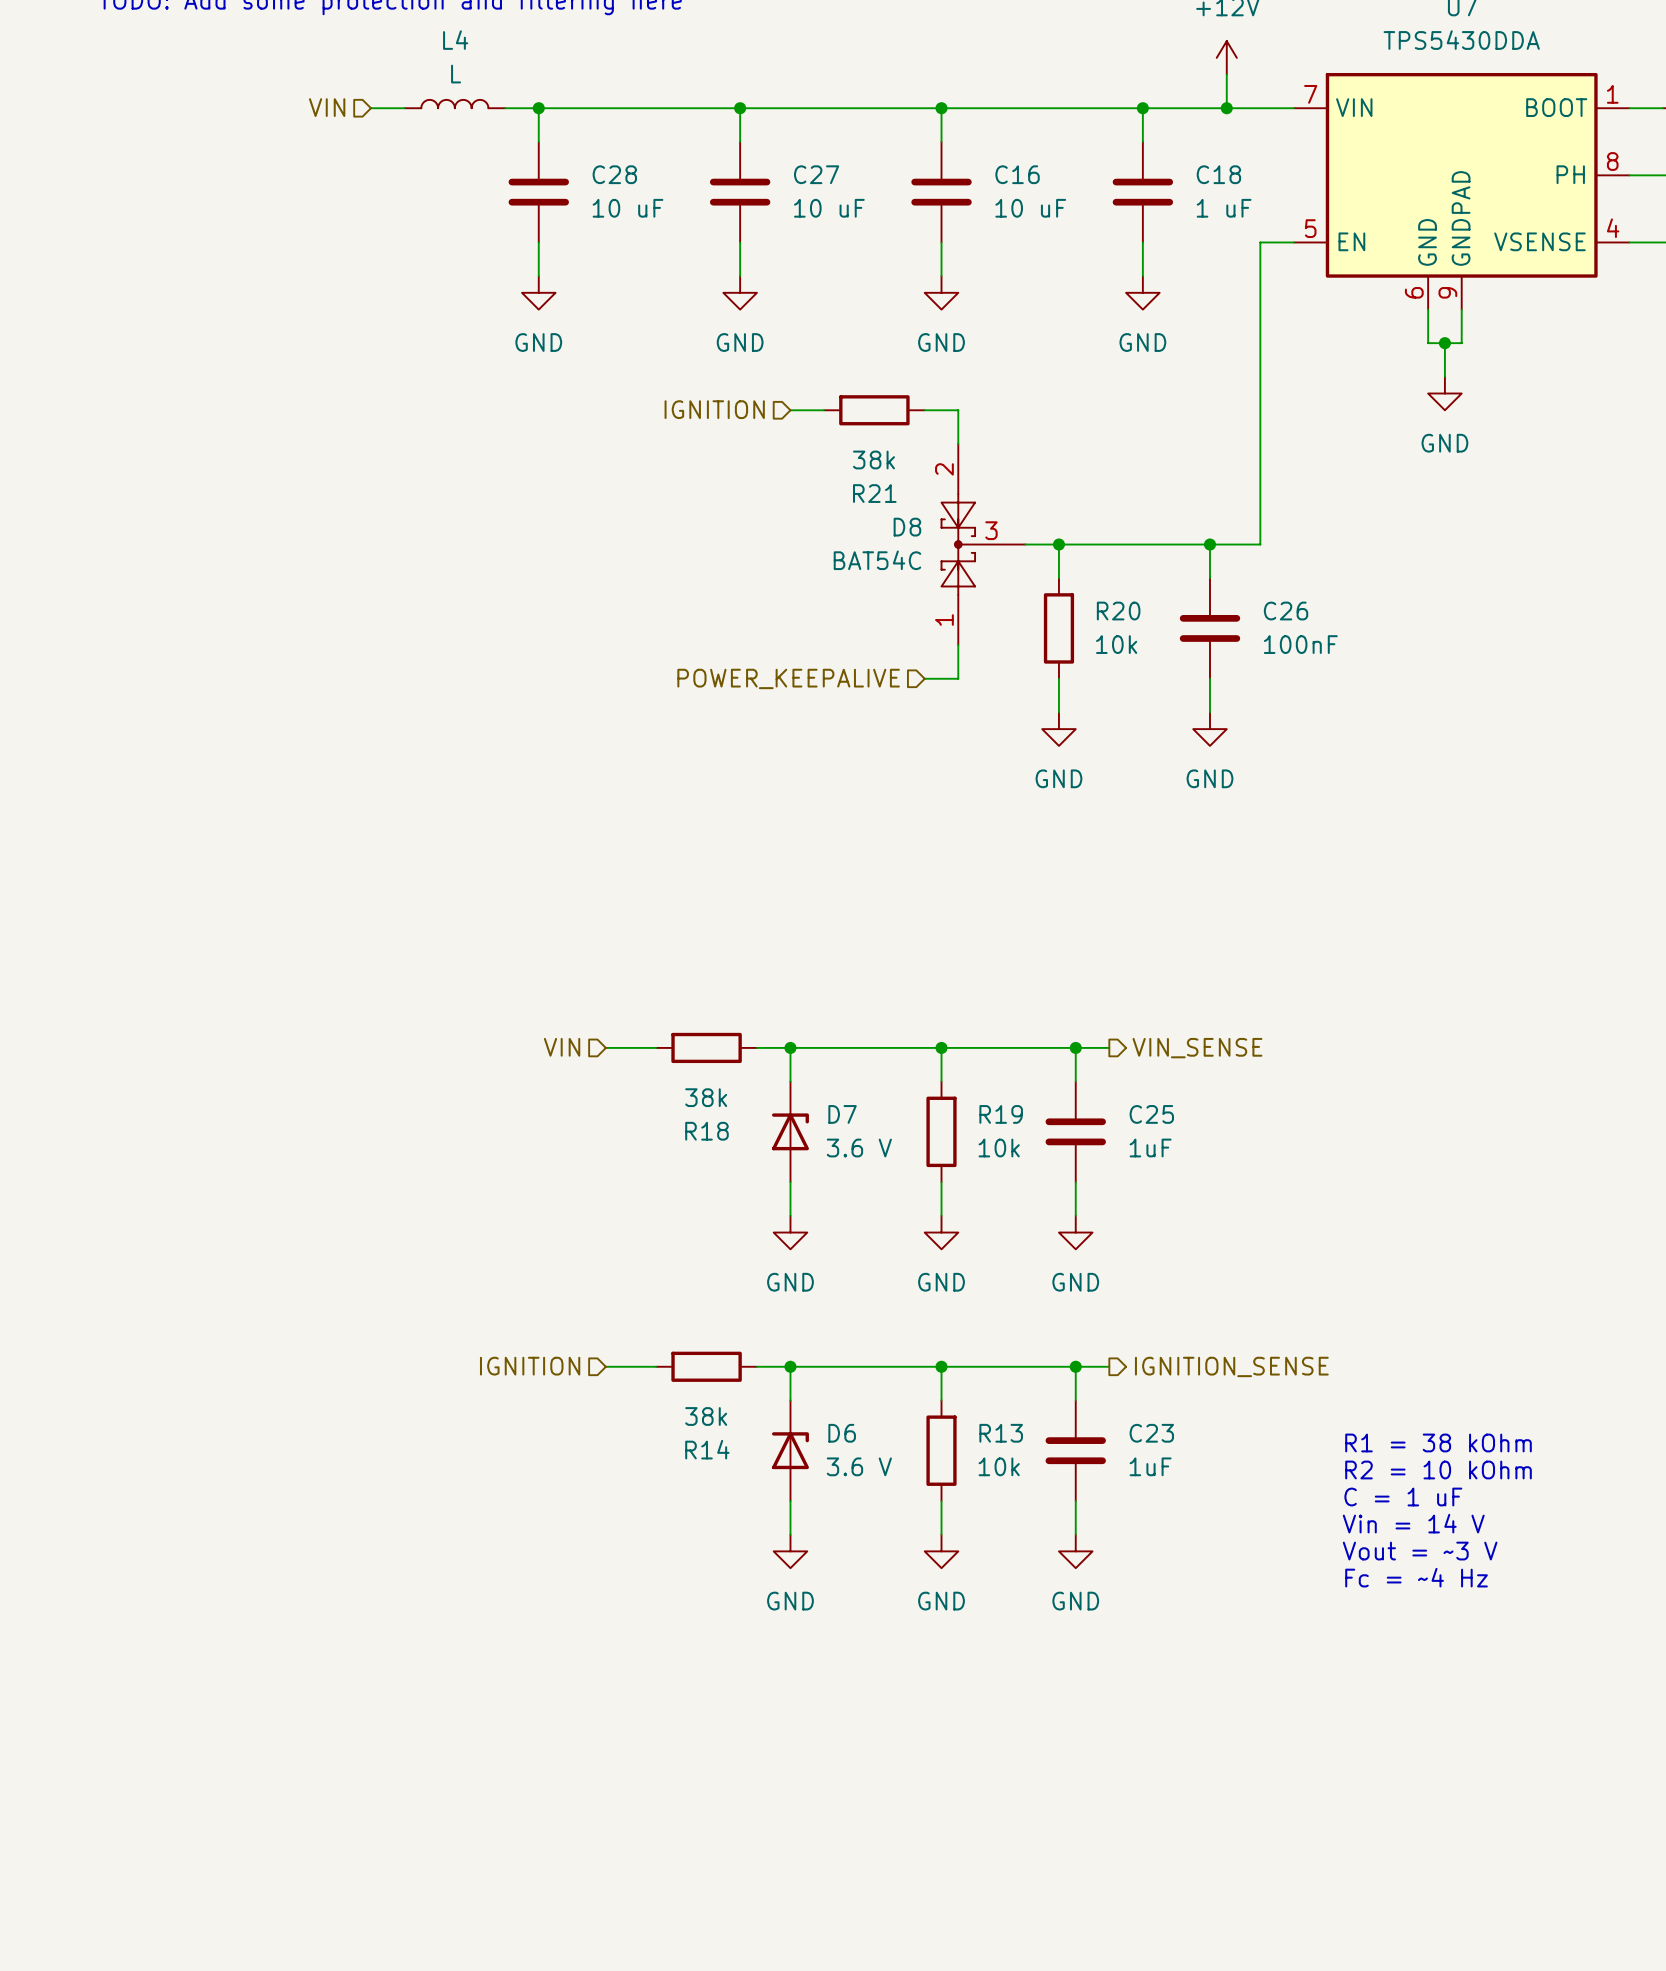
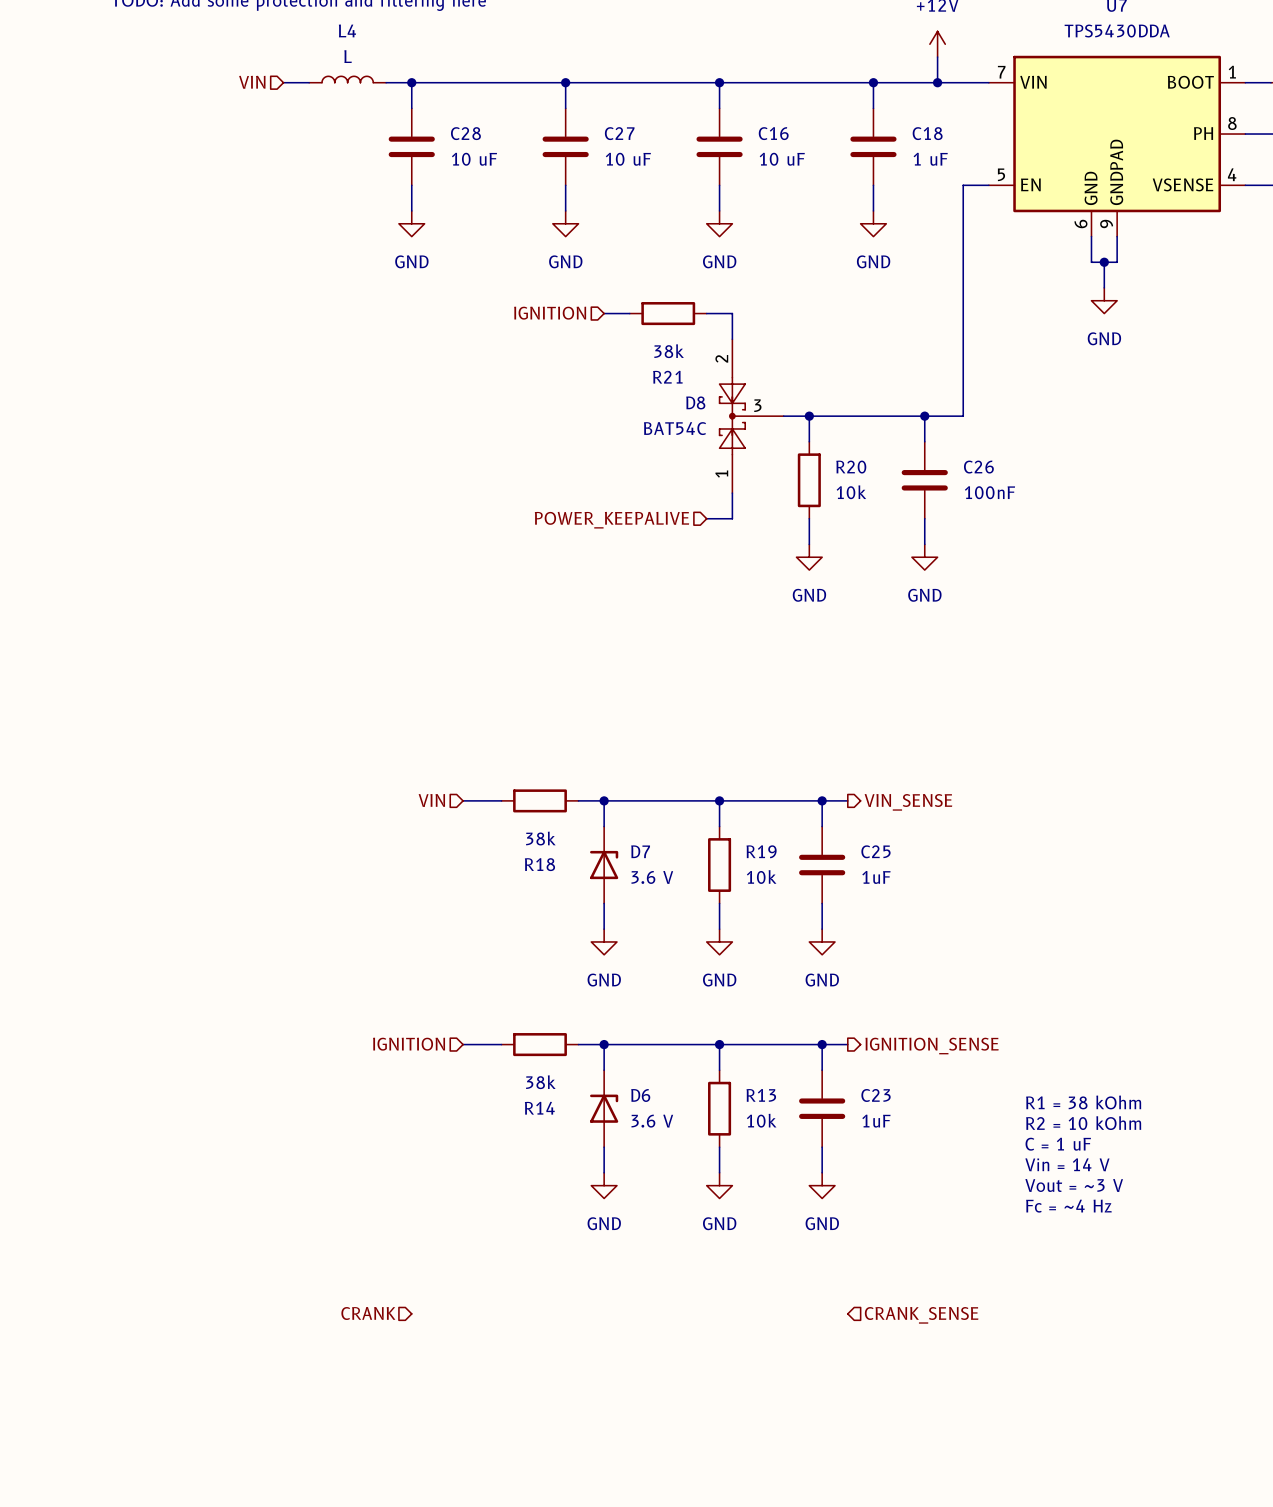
hierarchical label: none -> CRANK (368, 1313)
hierarchical label: none -> CRANK_SENSE (921, 1315)

